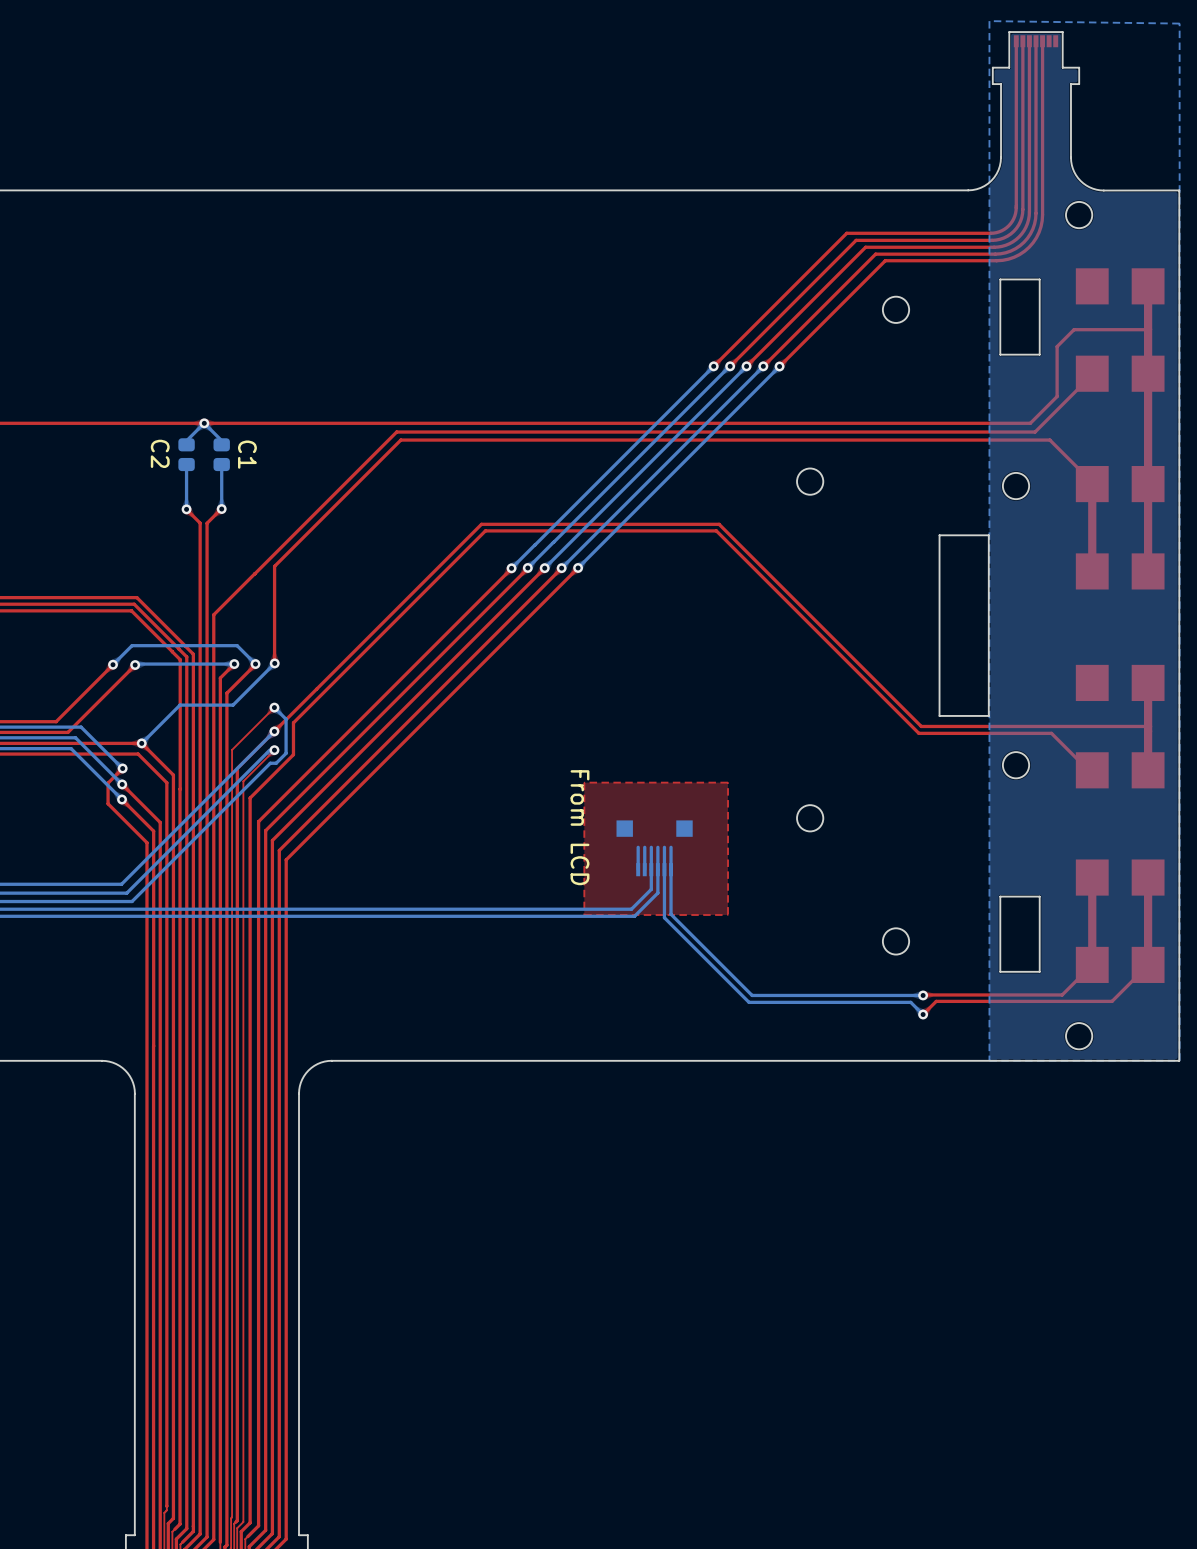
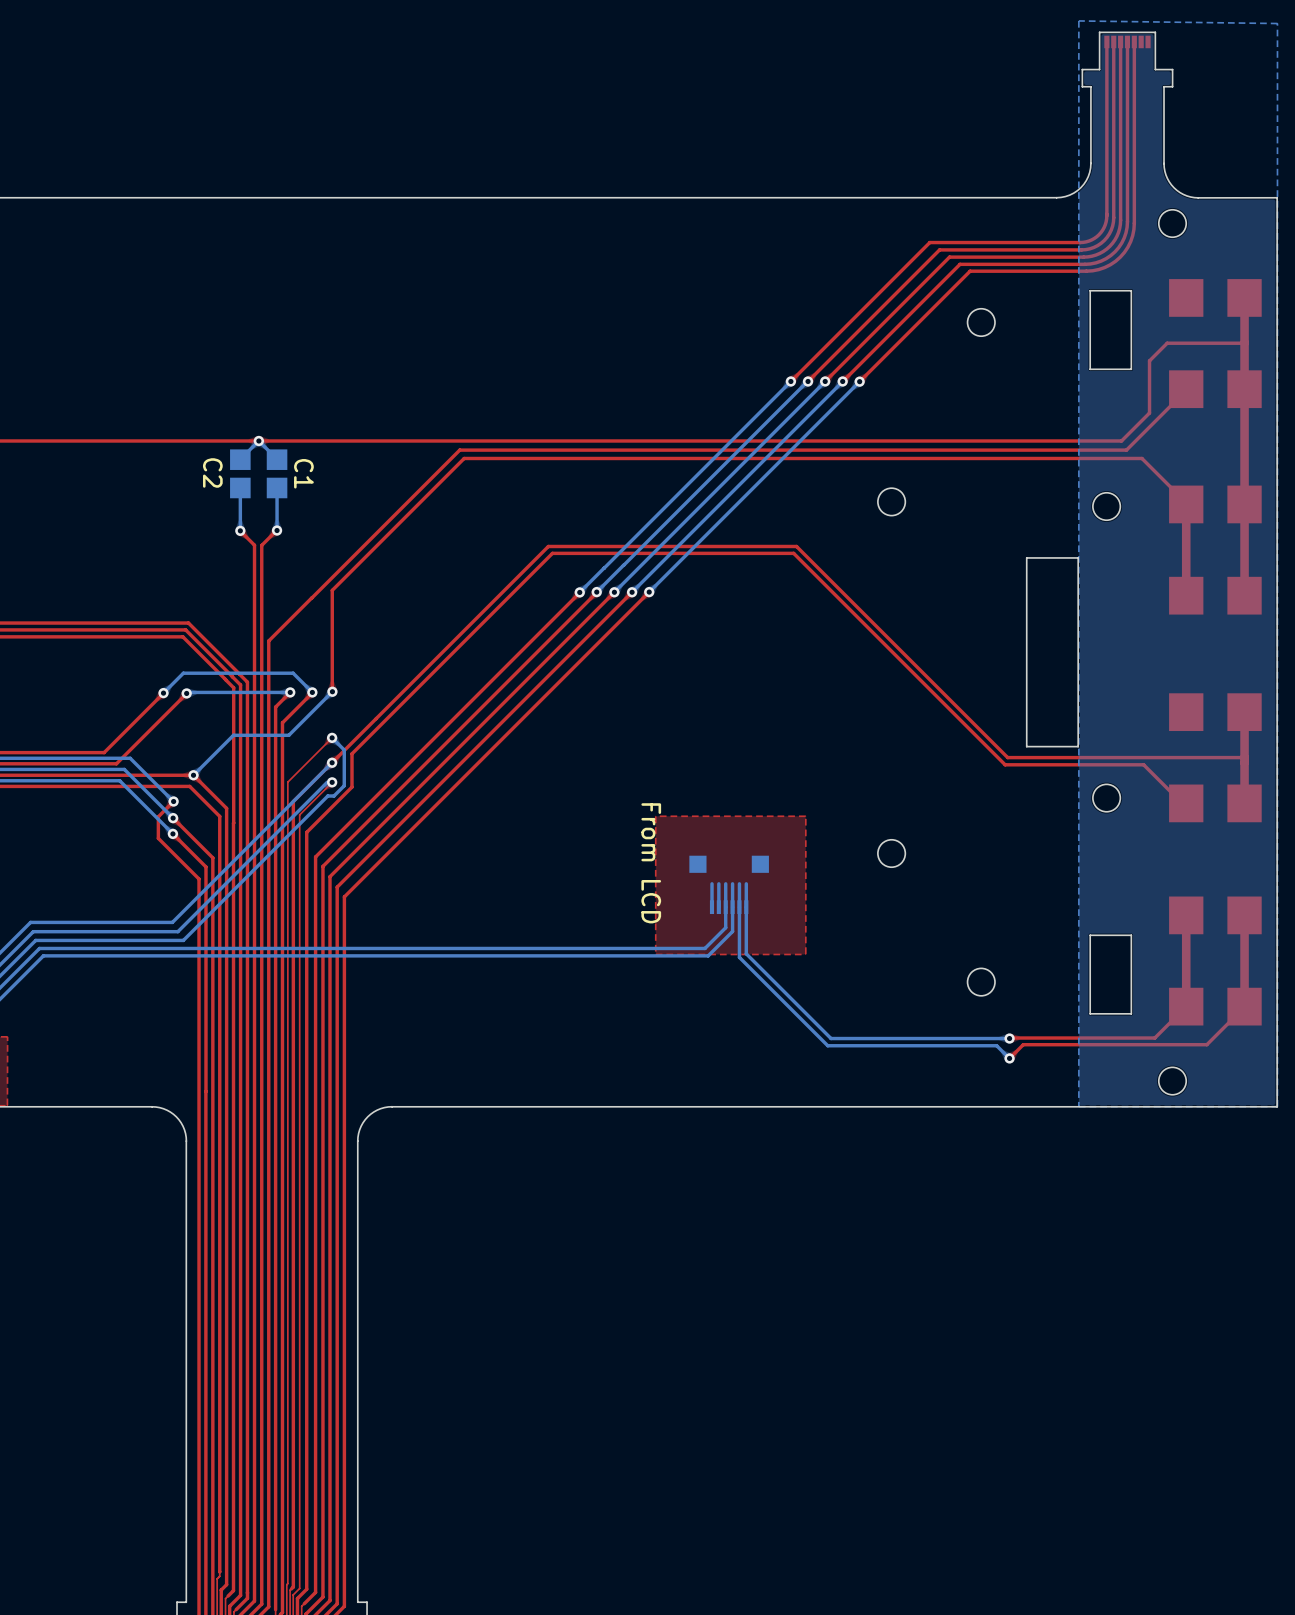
C2 footprint: [178, 438, 195, 472] -> [230, 449, 251, 499]
C1 footprint: [213, 438, 230, 472] -> [266, 449, 288, 499]

